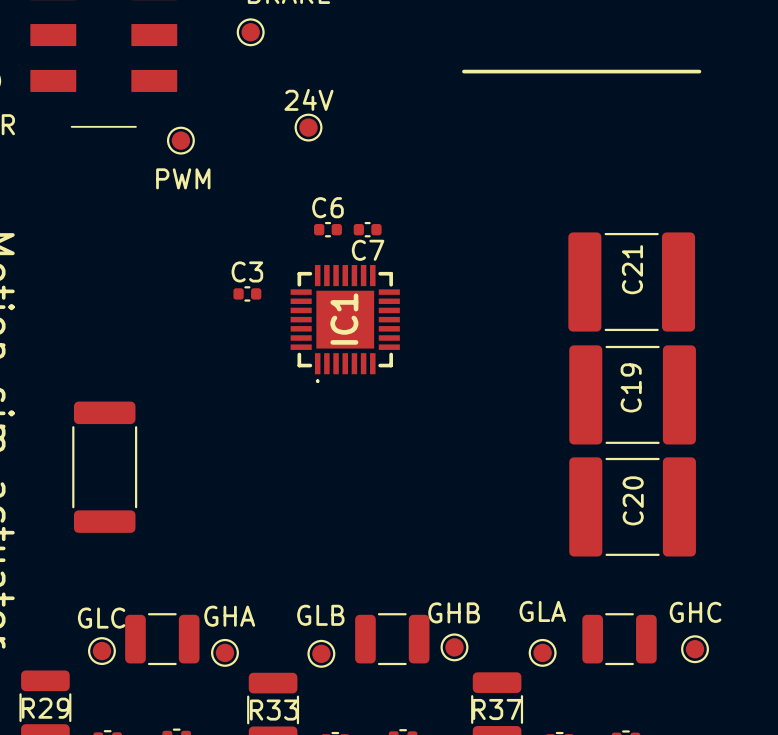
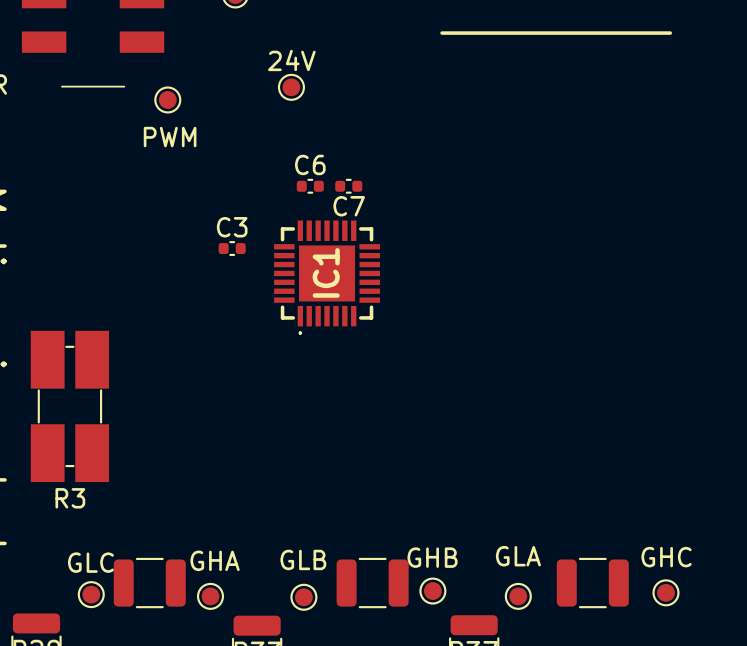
C21: (631, 282) -> none
C19: (632, 394) -> none
R3: none -> (69, 406)
part: (104, 467) -> none
C20: (632, 506) -> none

